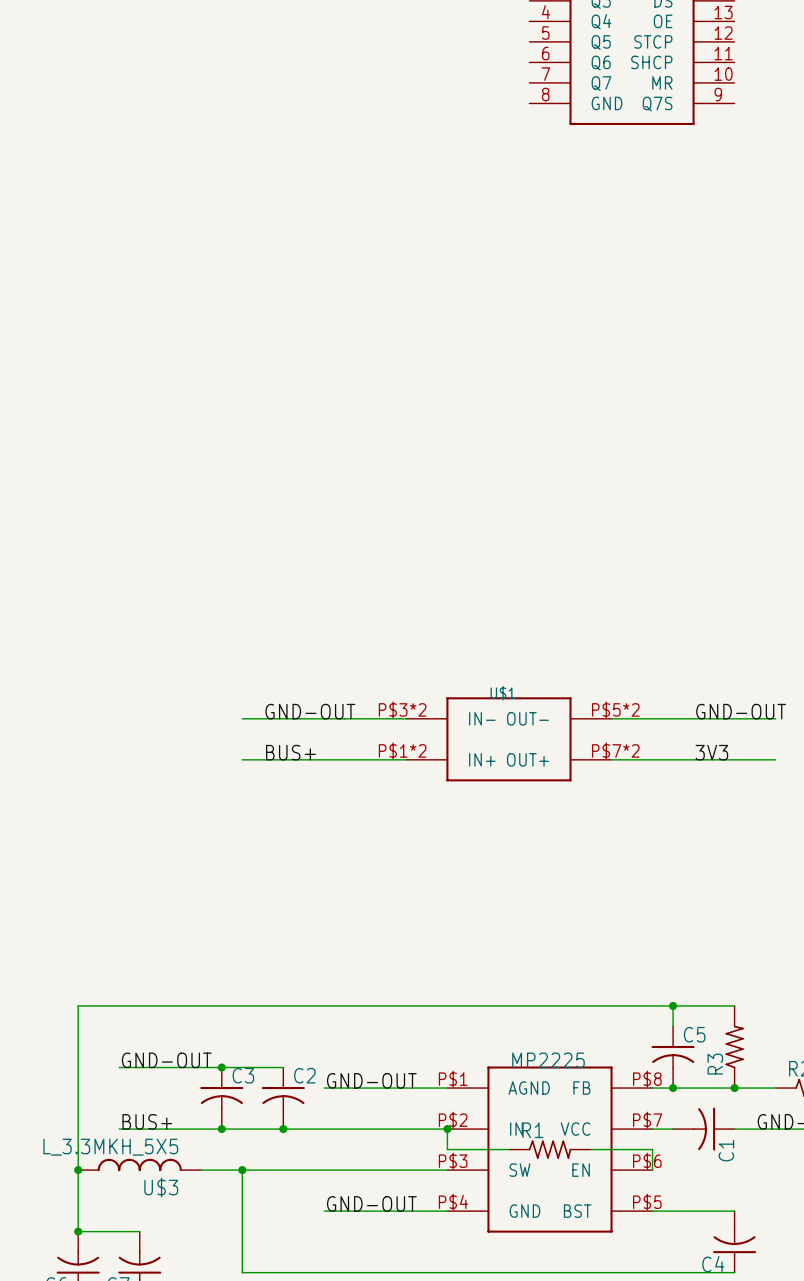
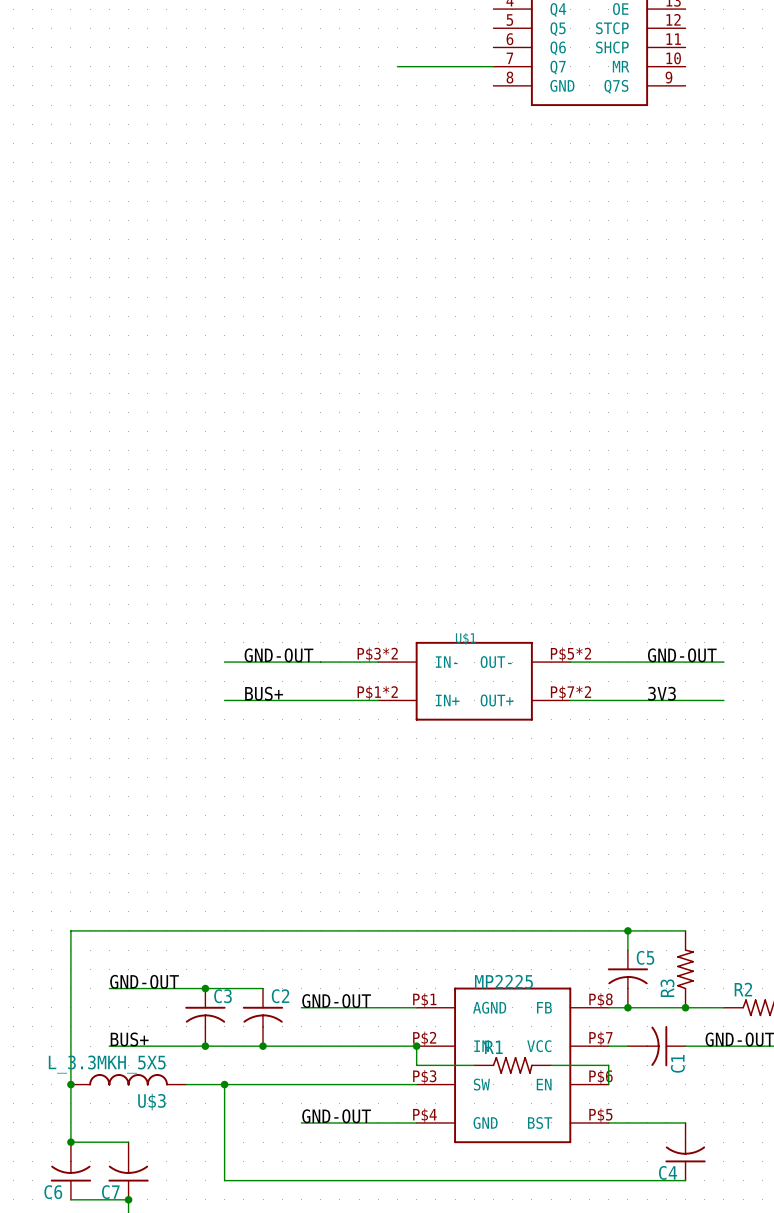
wire: none -> (397, 66) (493, 66)

